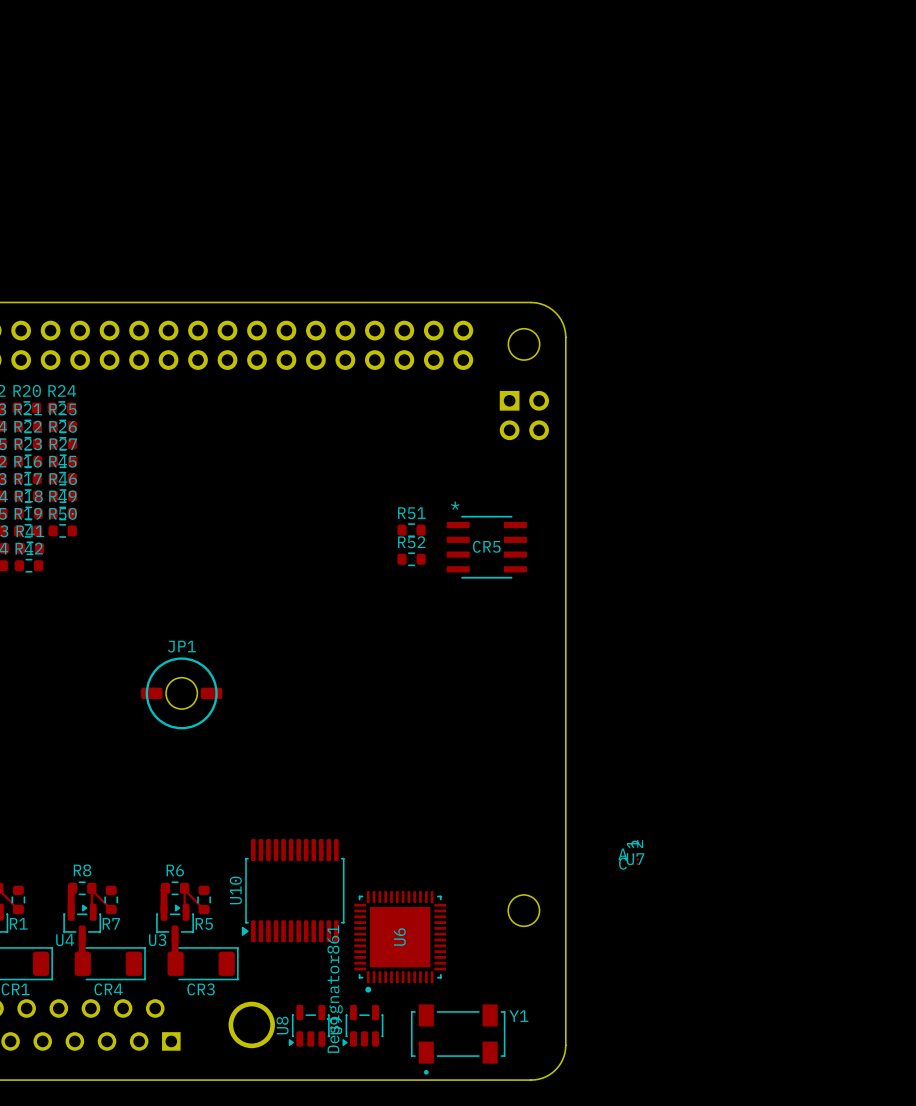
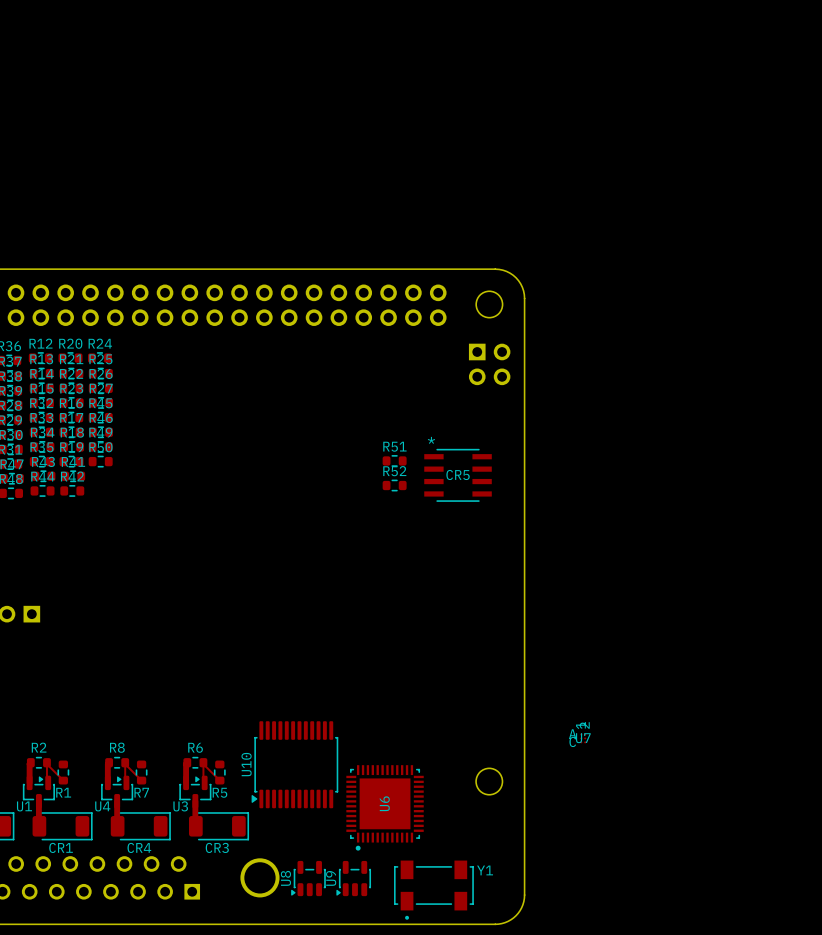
JP1: (181, 693) -> none
U6 text: Designator861 (334, 989) -> none

